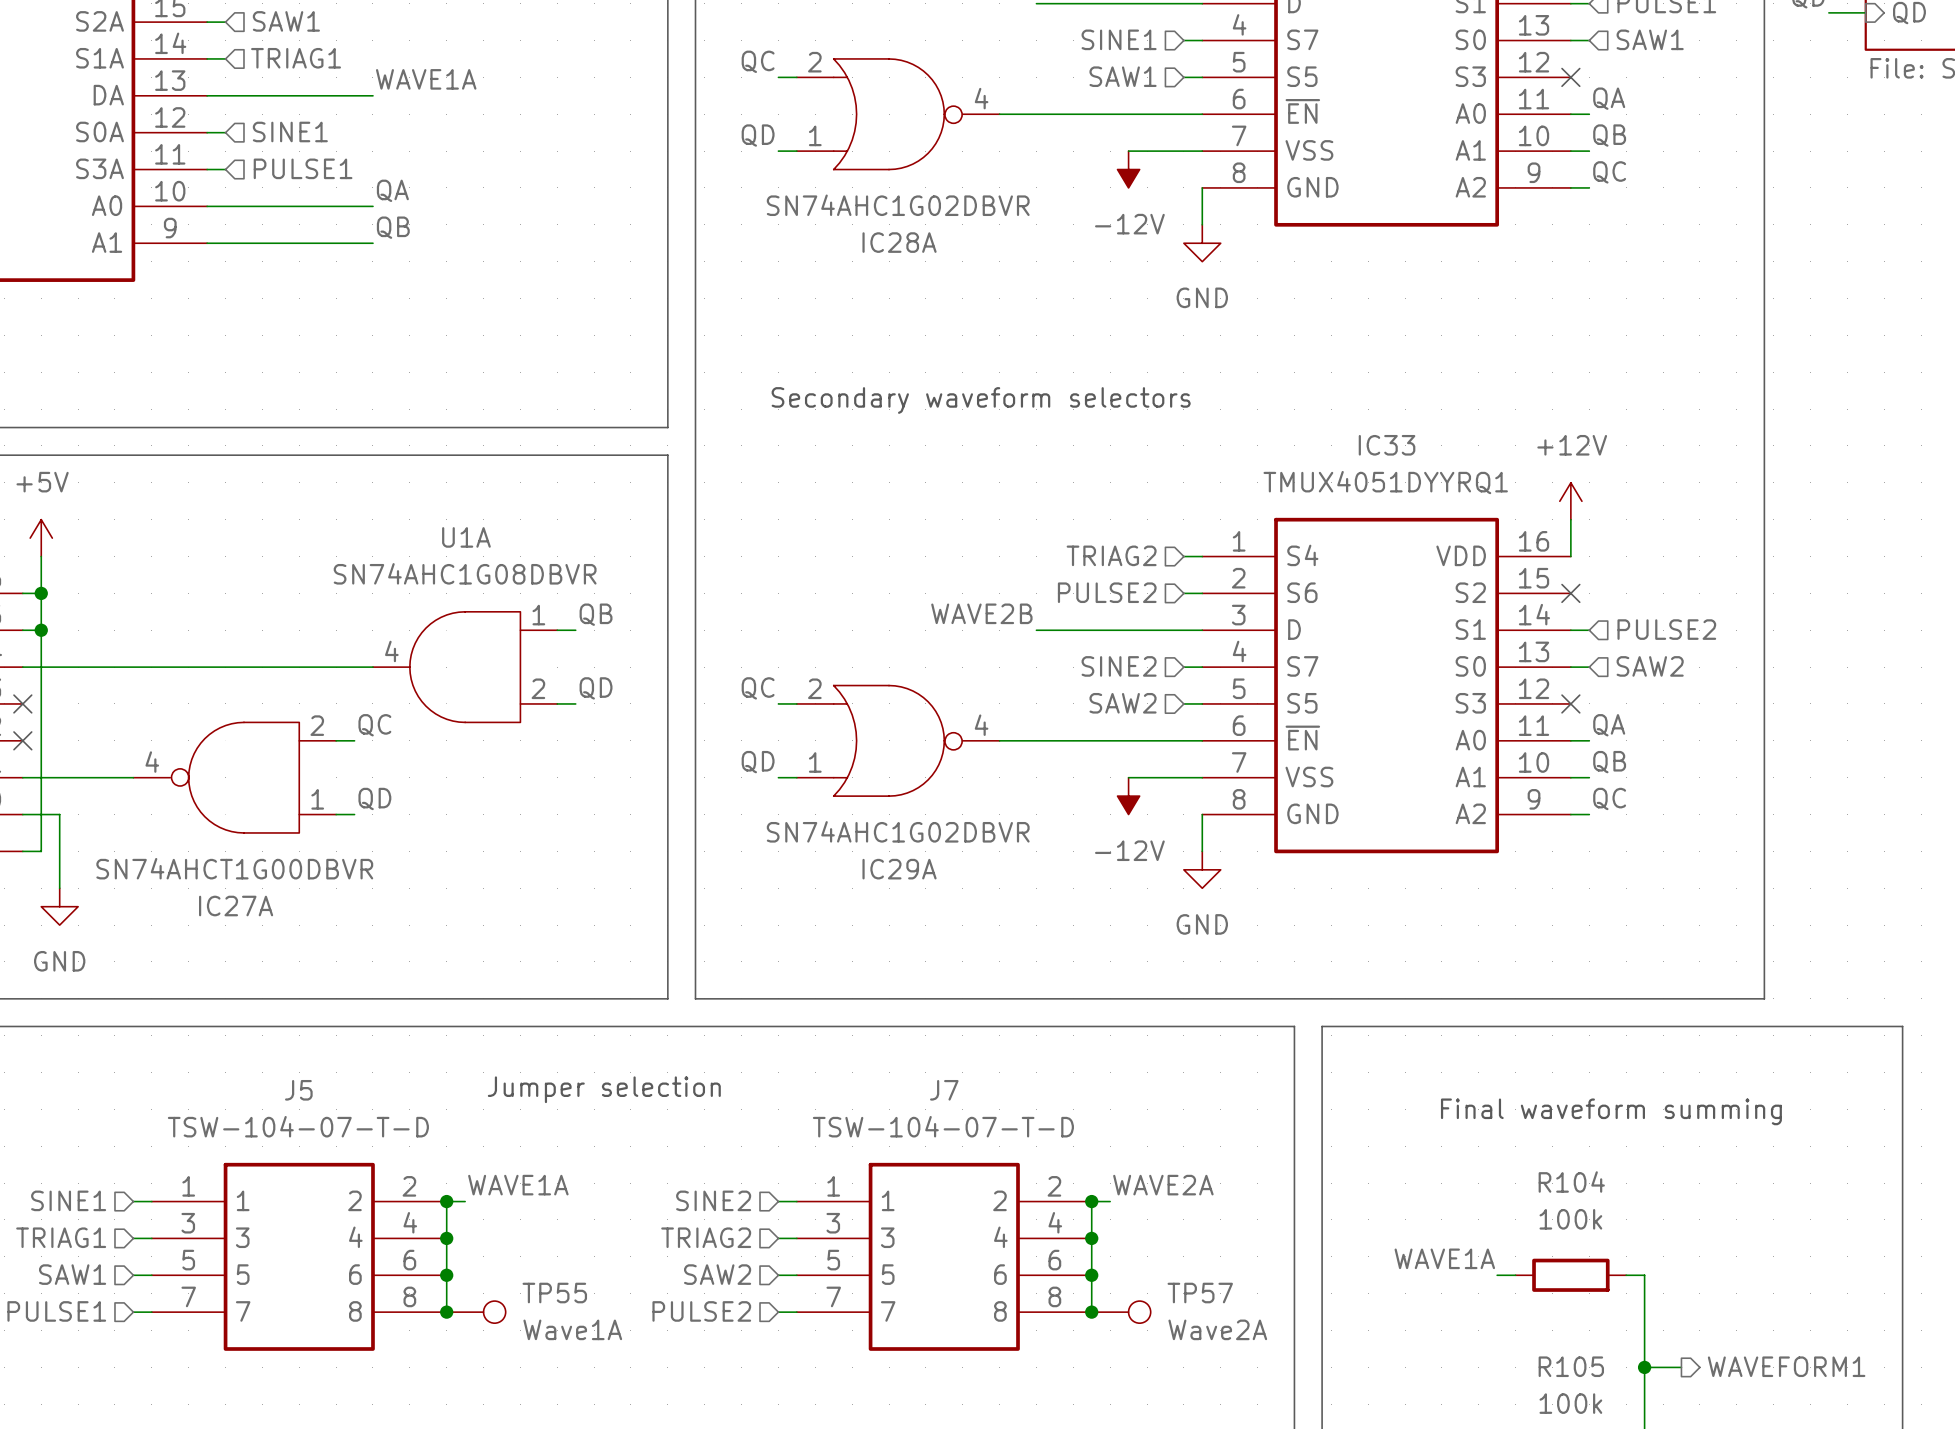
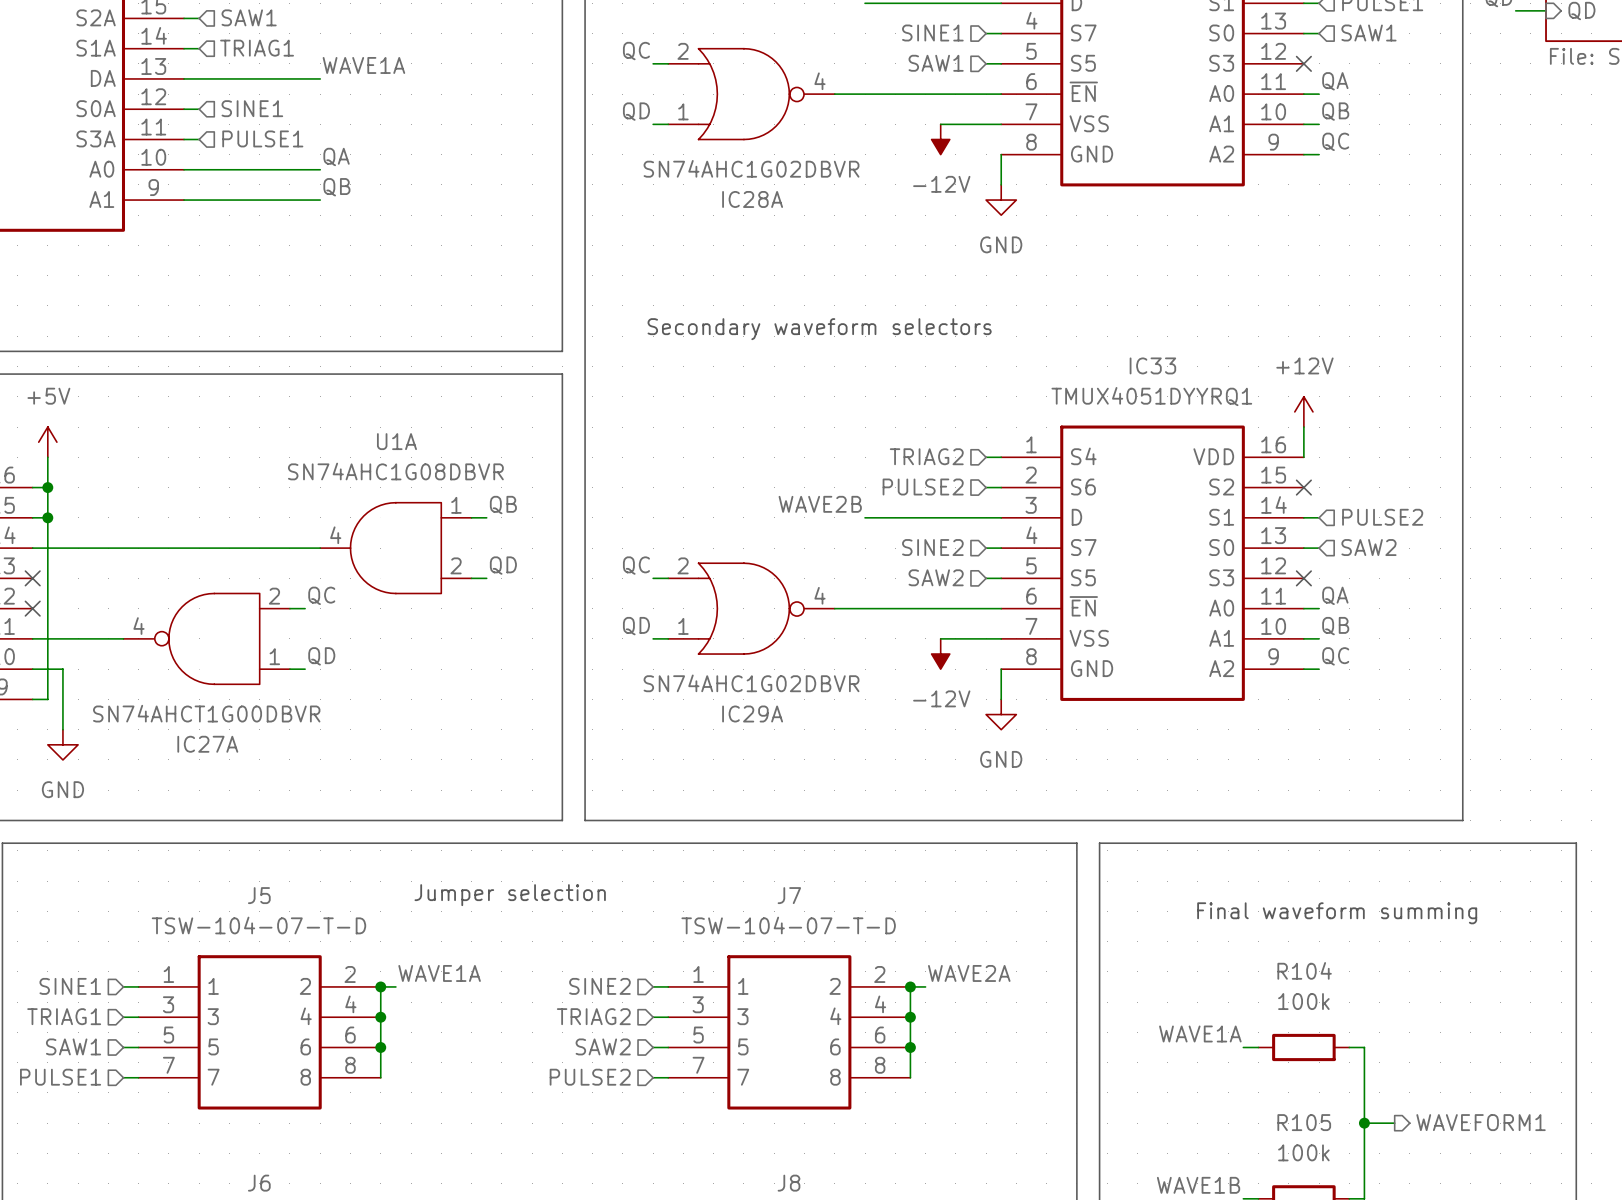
junction: (446, 1312) -> none
TP55: Wave1A (476, 1312) -> none
junction: (1091, 1312) -> none
TP57: Wave2A (1121, 1312) -> none

